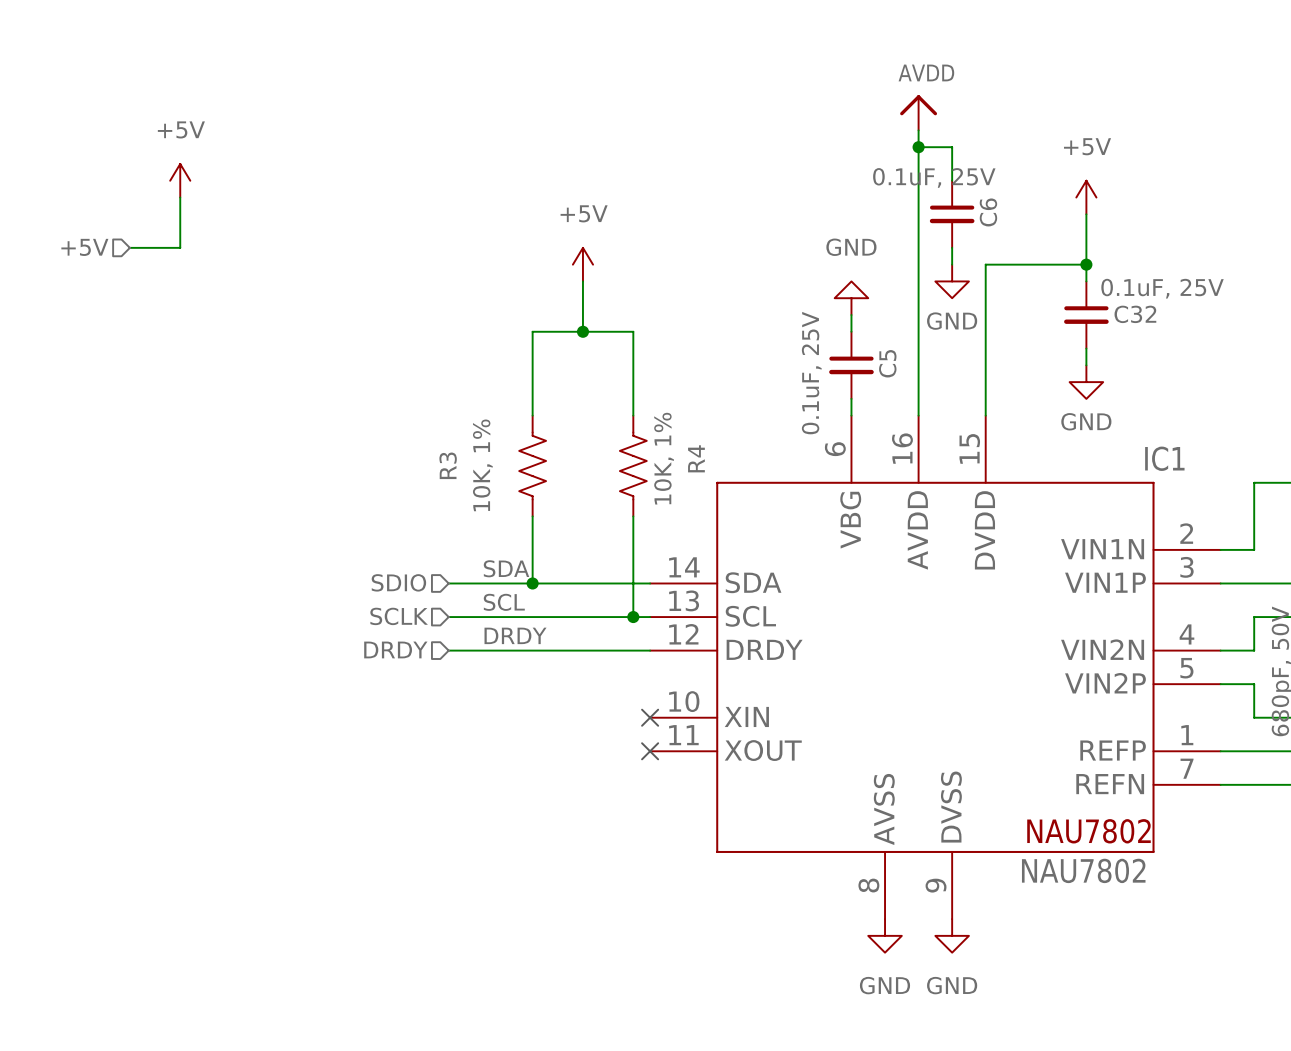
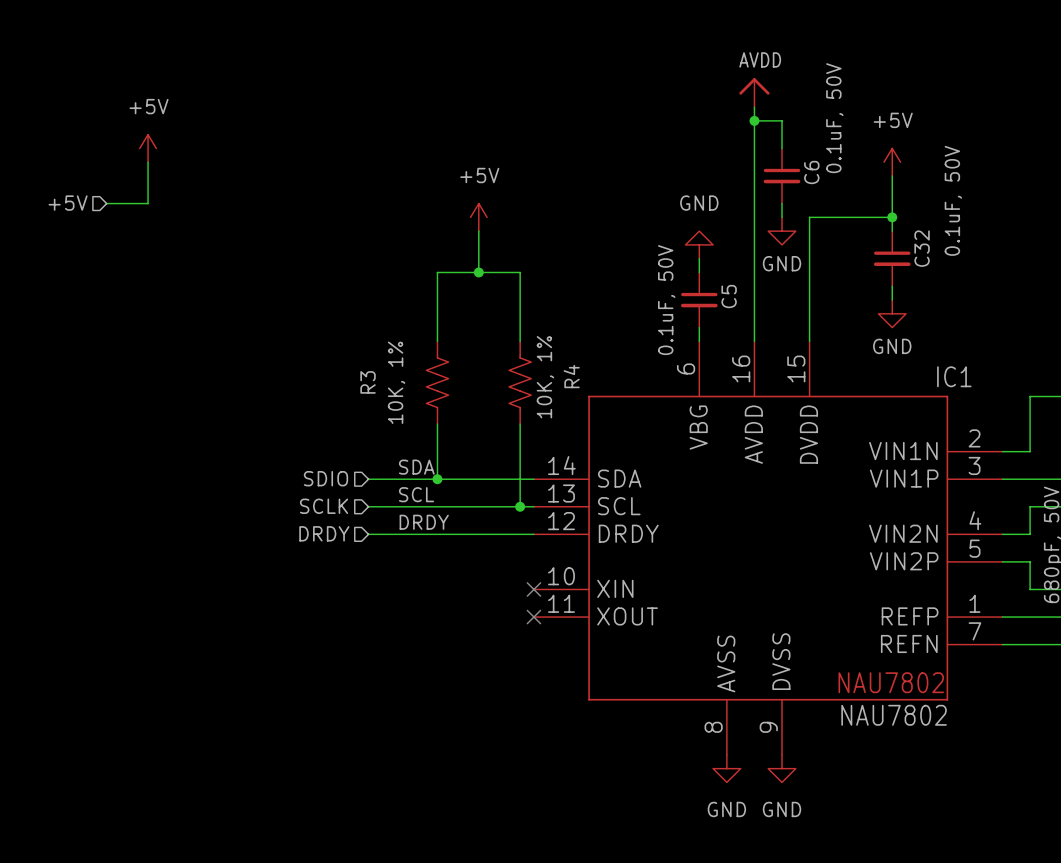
C6 value: 0.1uF, 25V (934, 177) -> 0.1uF, 50V (834, 118)
C32 value: 0.1uF, 25V (1162, 288) -> 0.1uF, 50V (953, 200)
C32 name rotation: 0° (1135, 314) -> 90° counterclockwise (922, 248)
C5 value: 0.1uF, 25V (811, 373) -> 0.1uF, 50V (666, 300)

